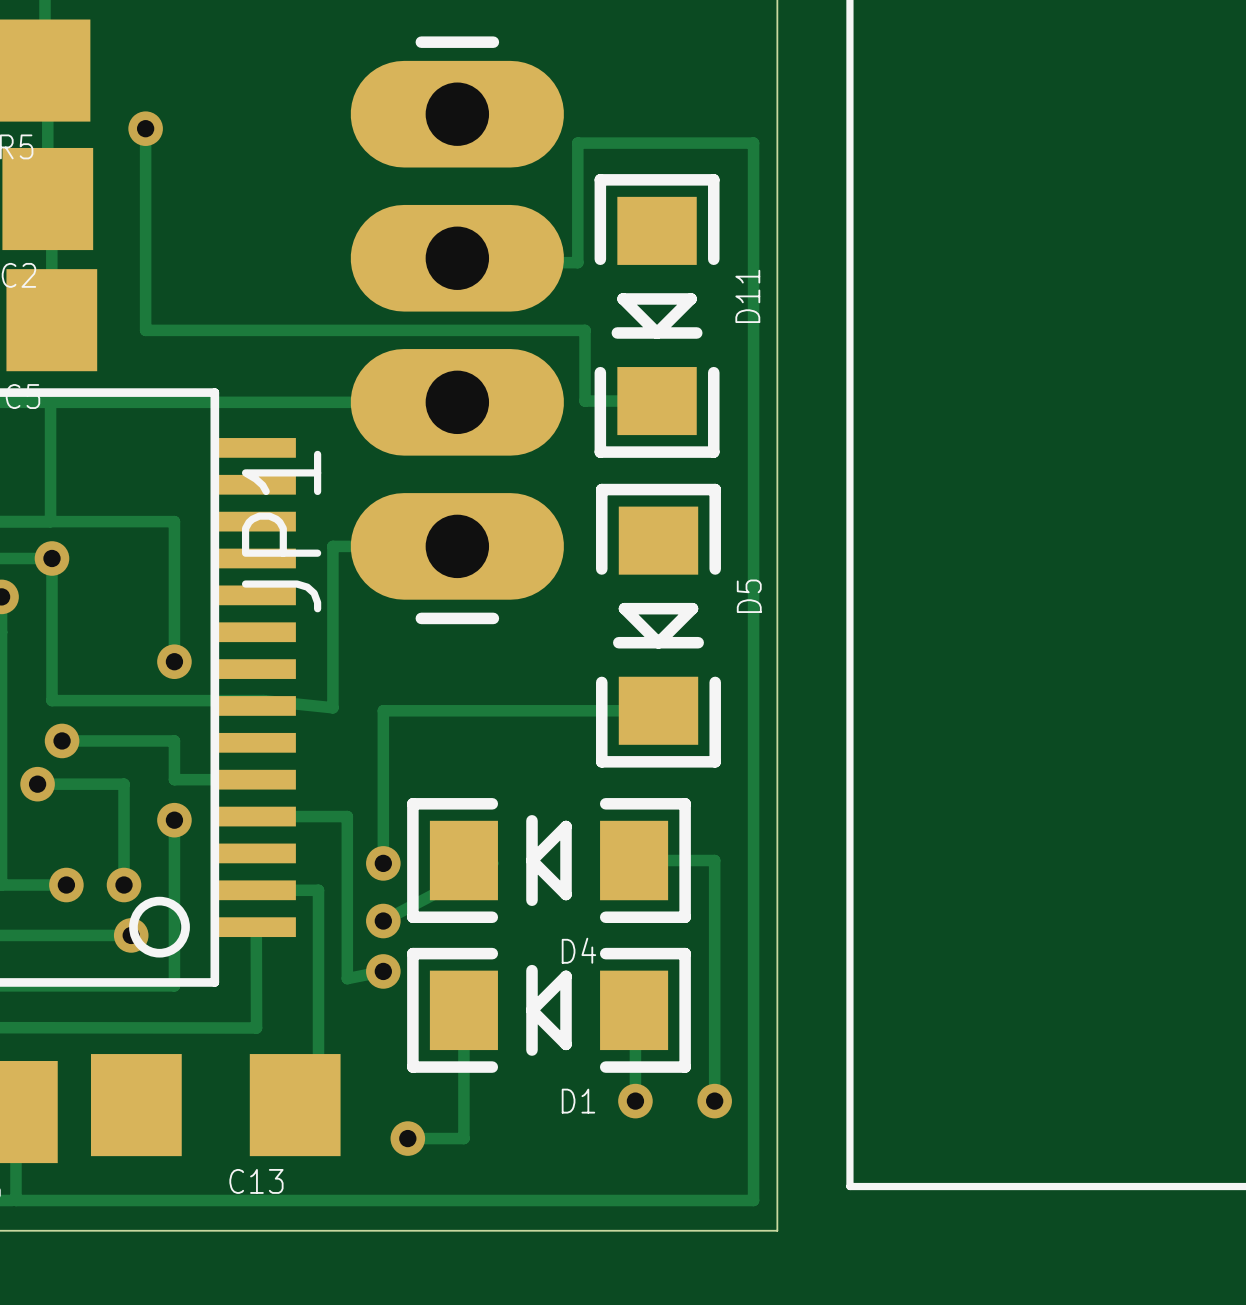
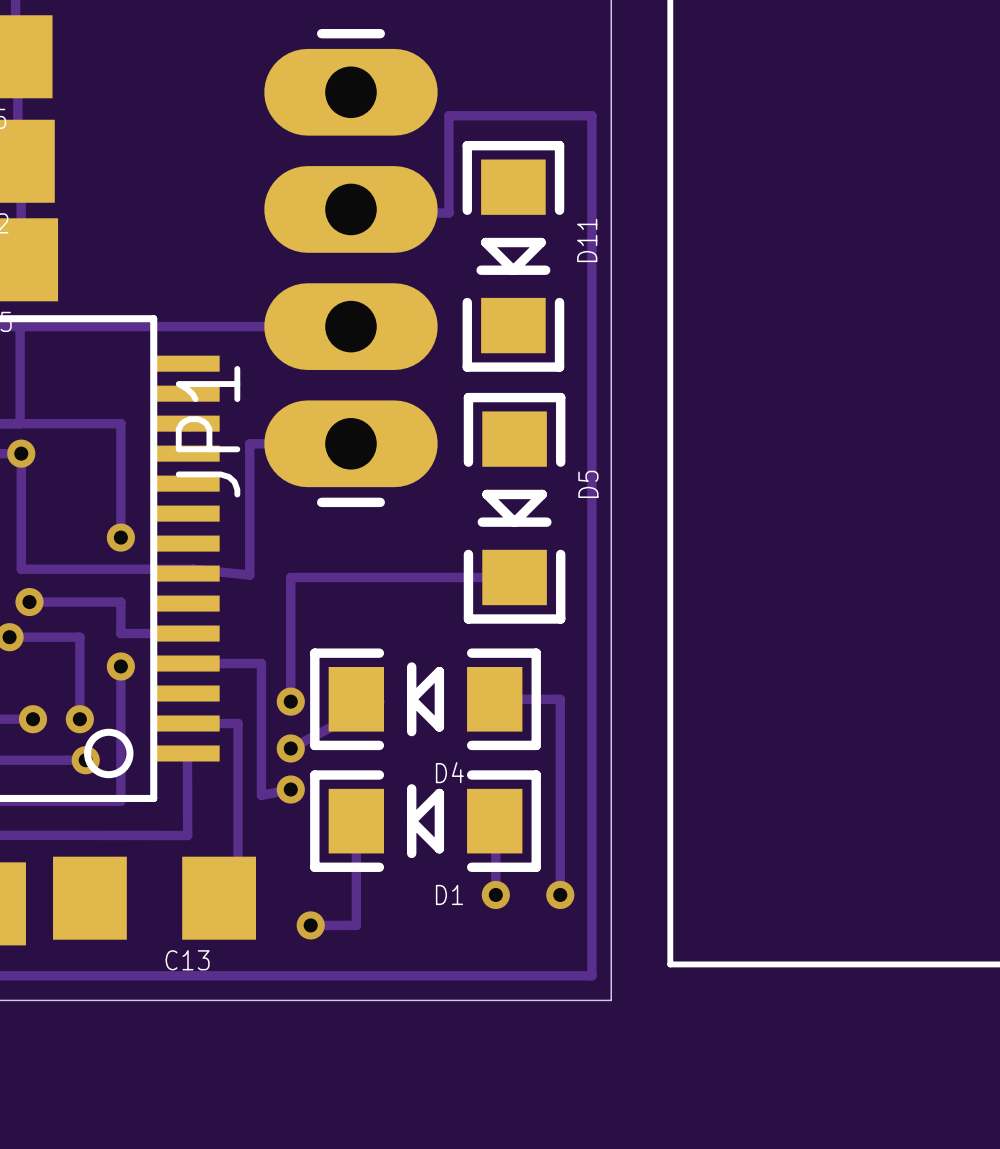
track: (145, 128) (145, 330) (585, 330) (585, 401) (657, 401) -> none
via: (145, 128) -> none

